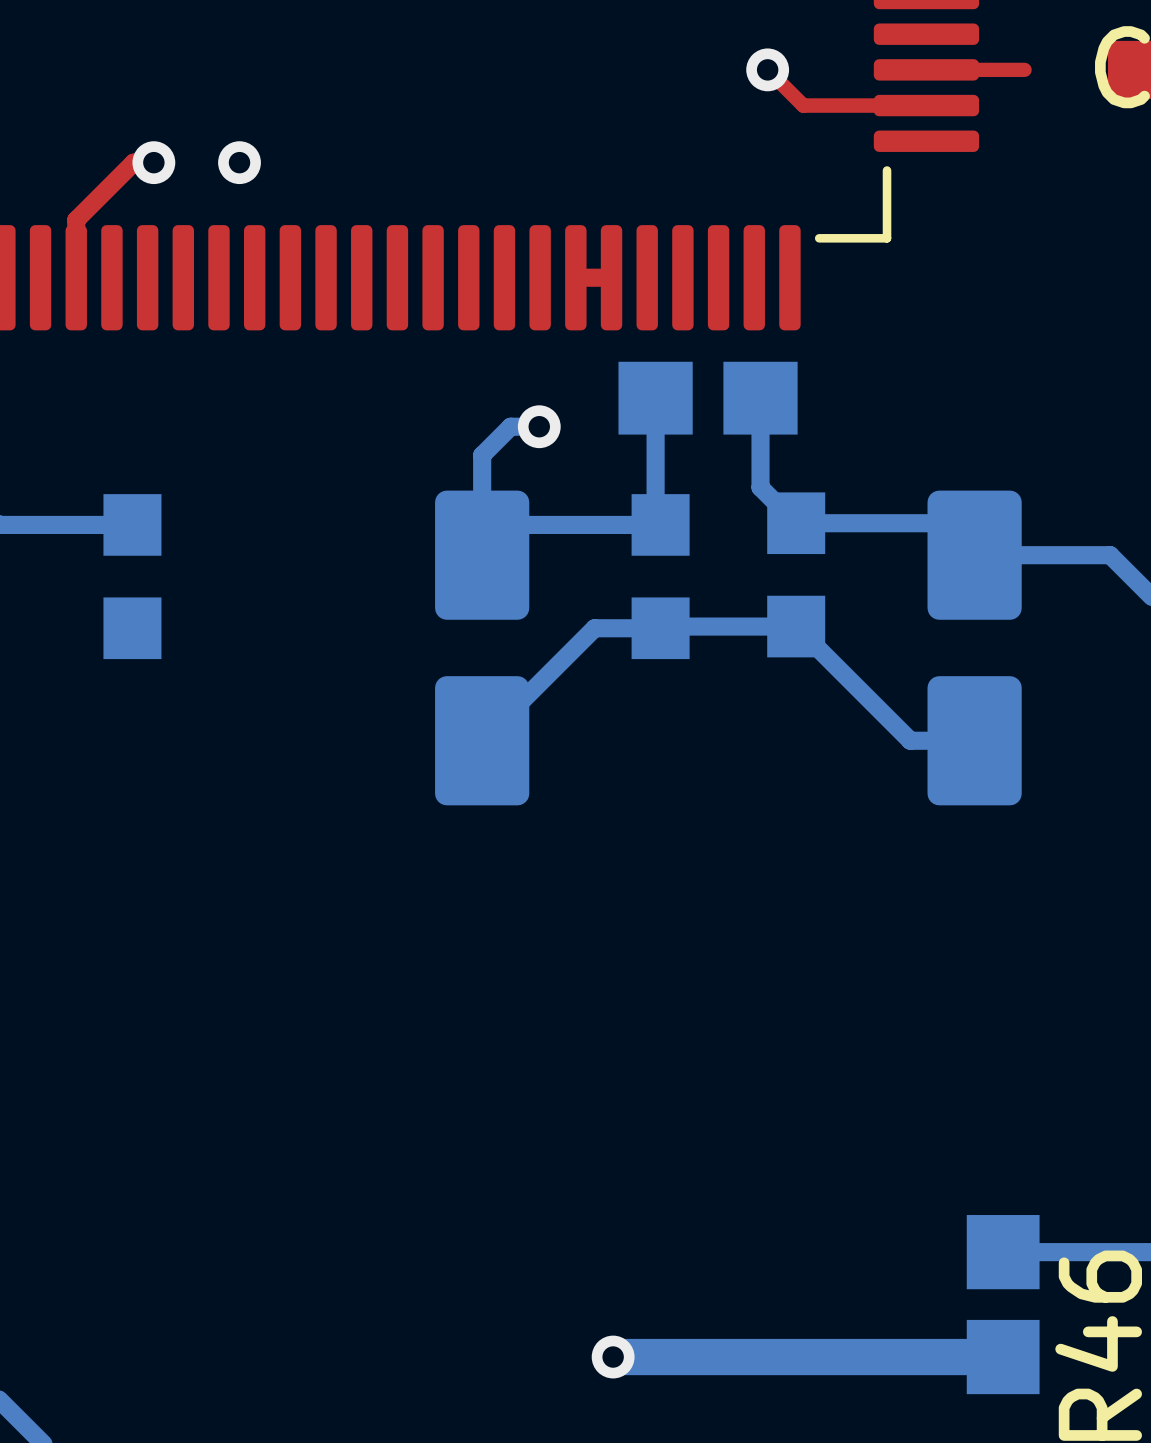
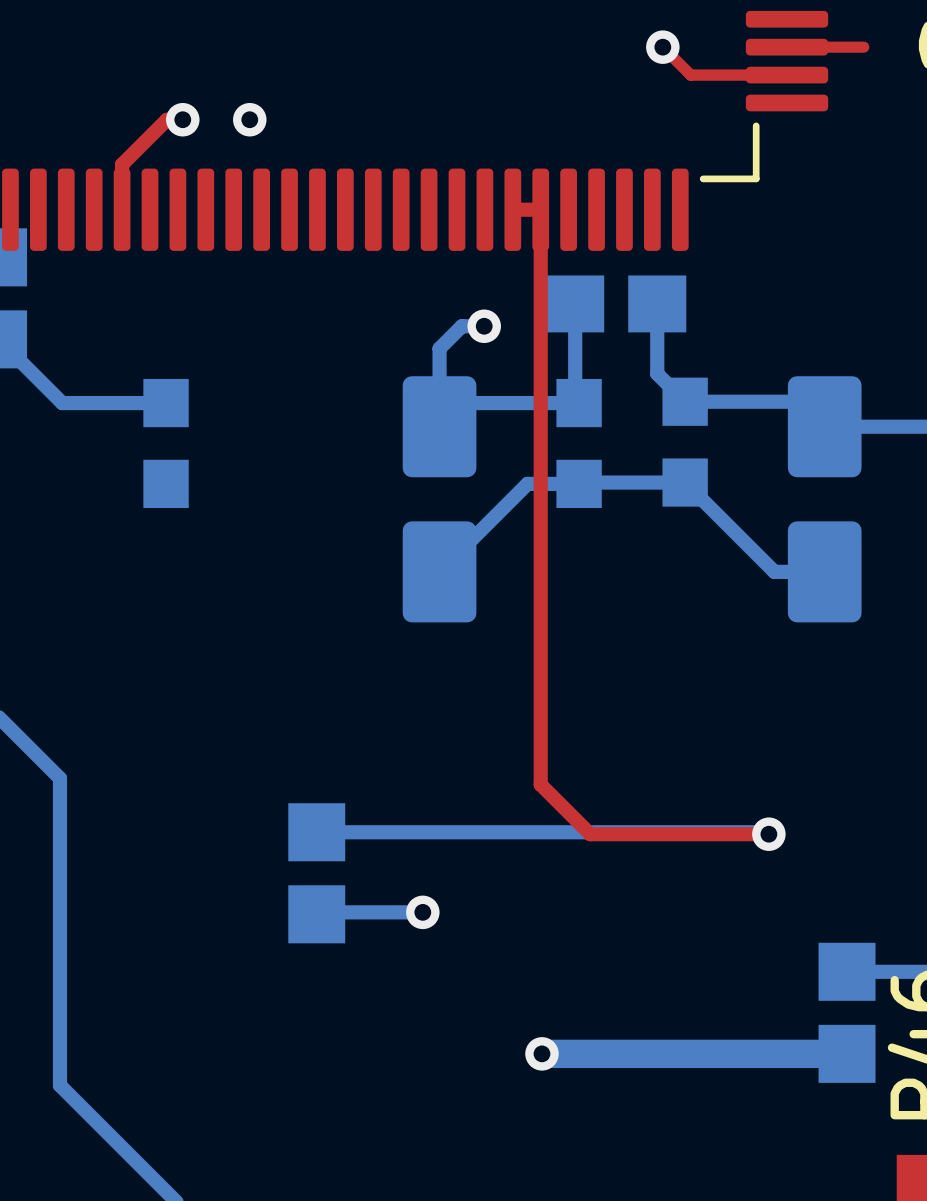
top track: none -> (540, 209) (540, 784) (590, 834) (768, 834)
bottom track: none -> (316, 832) (761, 832) (768, 834)
via: none -> (768, 834)
part: none -> (316, 873)
bottom track: none -> (422, 912) (318, 912) (316, 914)
via: none -> (422, 912)

